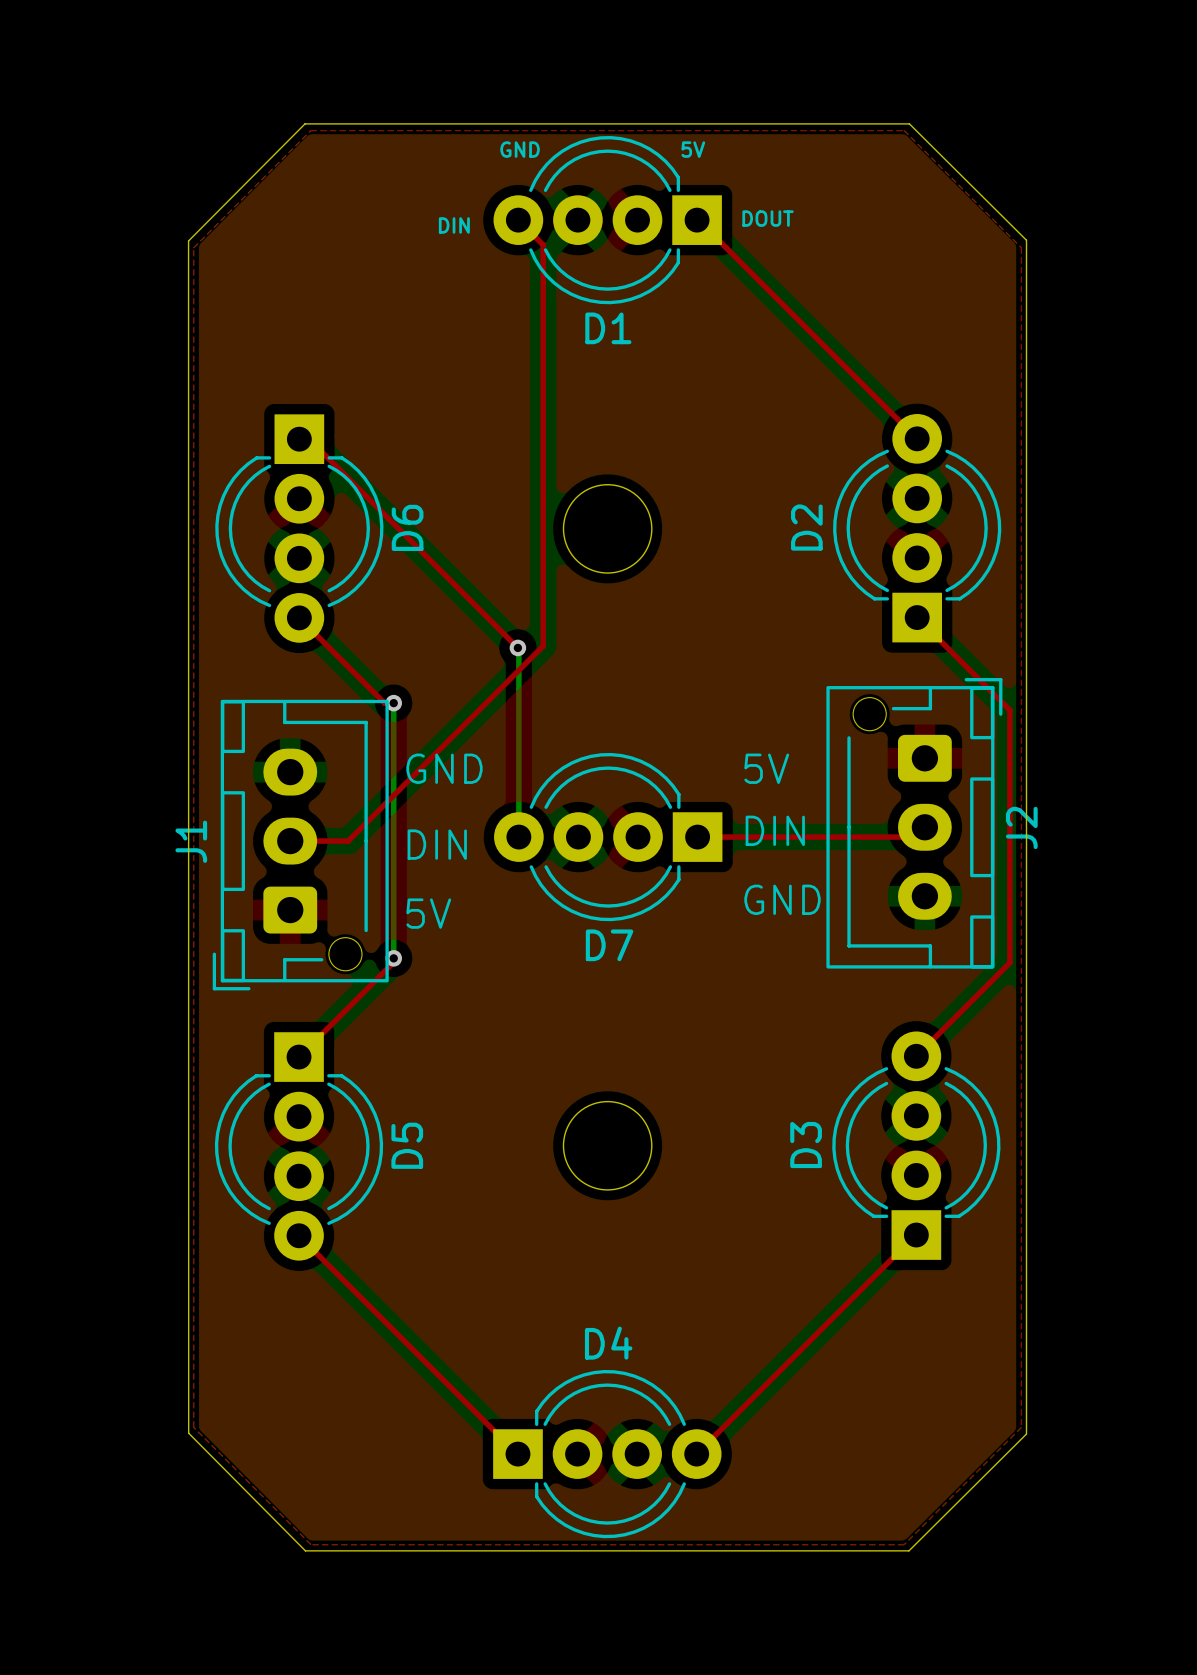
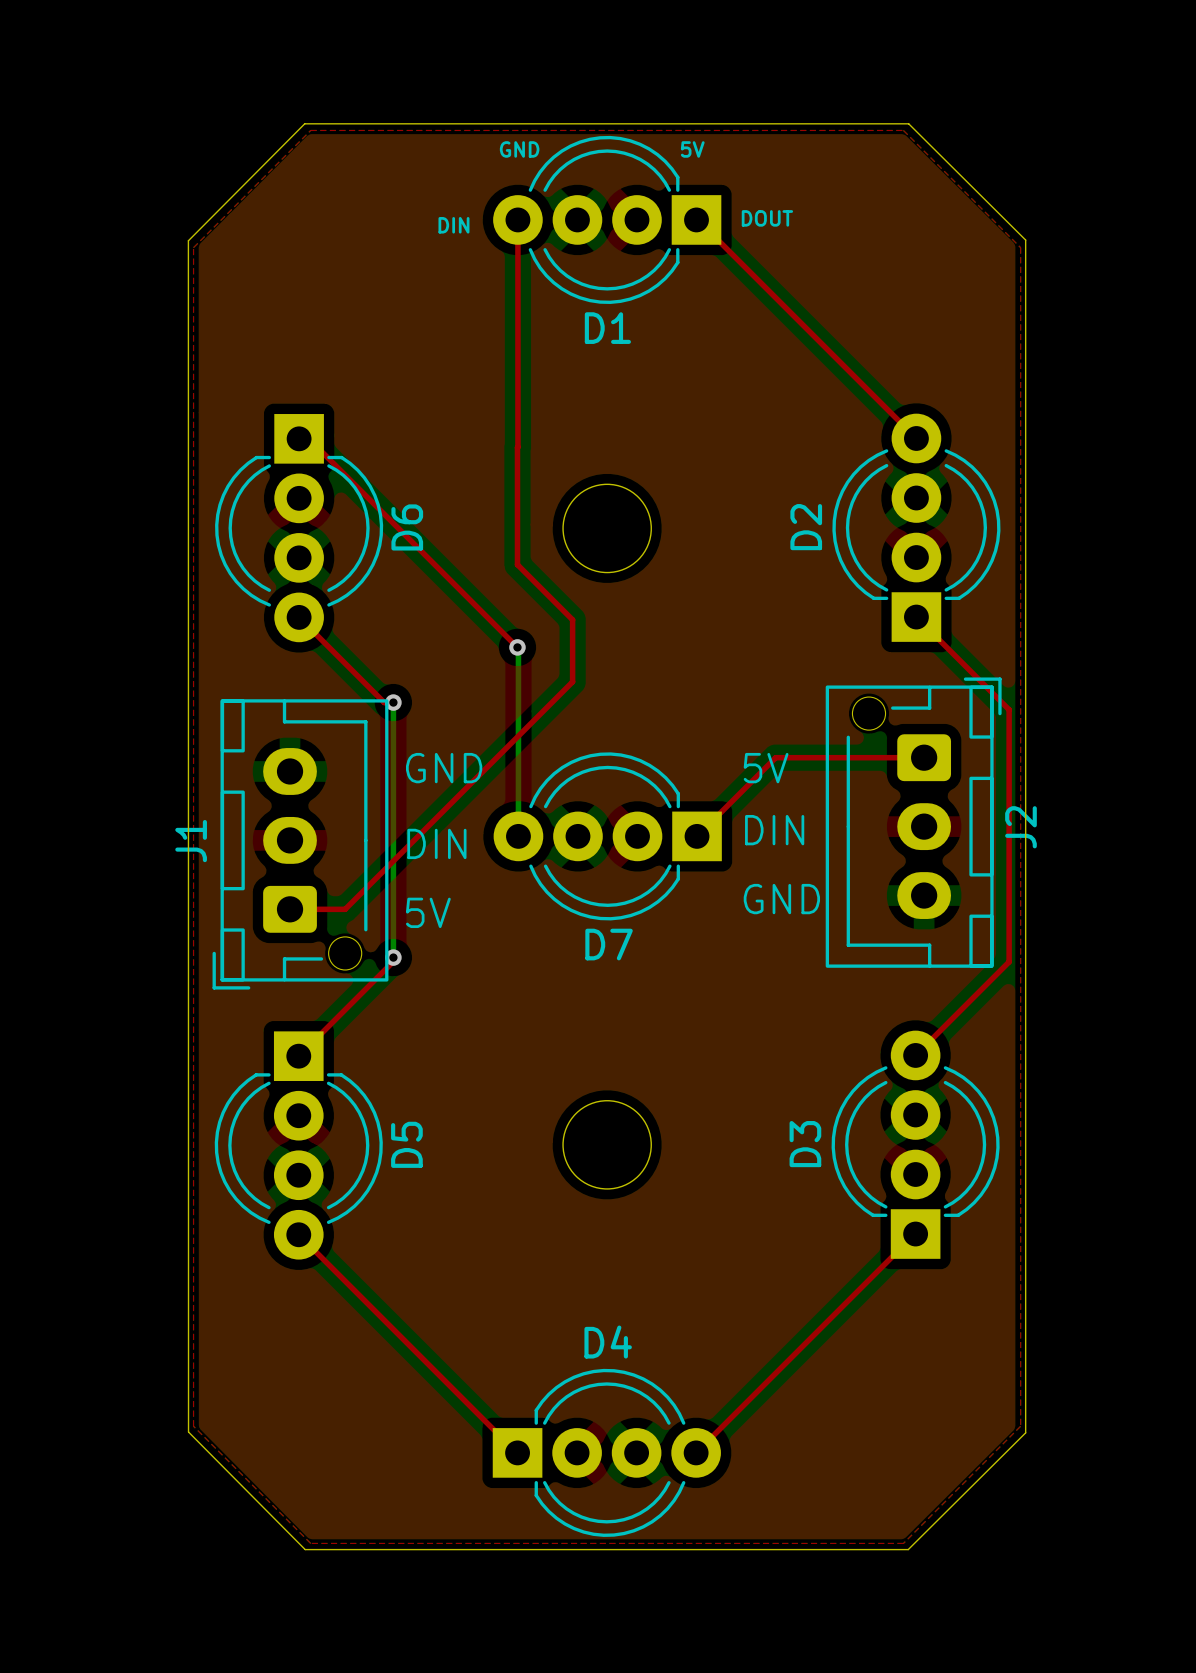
top track: (518, 220) (543, 244) (543, 646) (348, 841) (290, 841) -> (517, 219) (517, 564) (572, 619) (572, 681) (345, 909) (290, 909)
top track: (924, 827) (915, 837) (697, 837) -> (924, 757) (775, 757) (697, 836)

